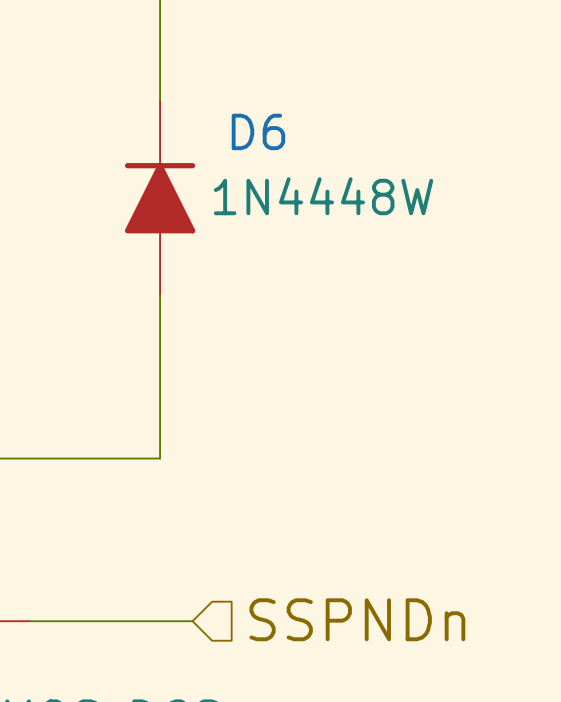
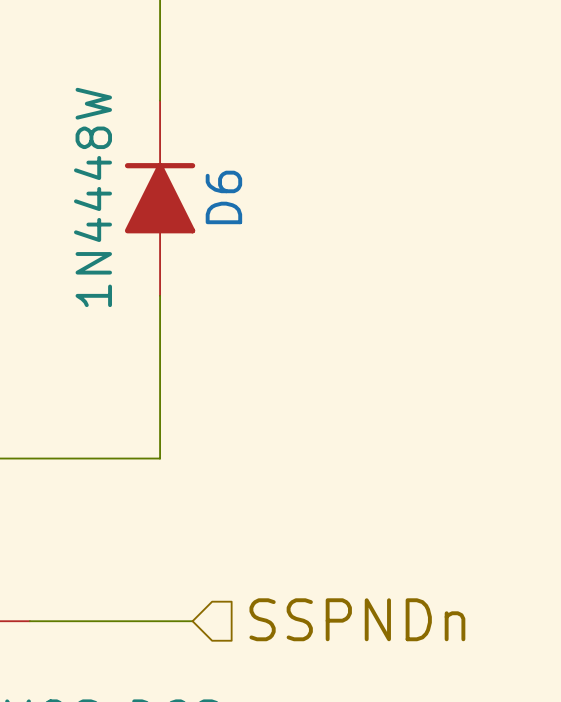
D6 name rotation: 0° (258, 131) -> 90° counterclockwise (223, 197)
D6 value rotation: 0° (323, 196) -> 90° counterclockwise (93, 197)

